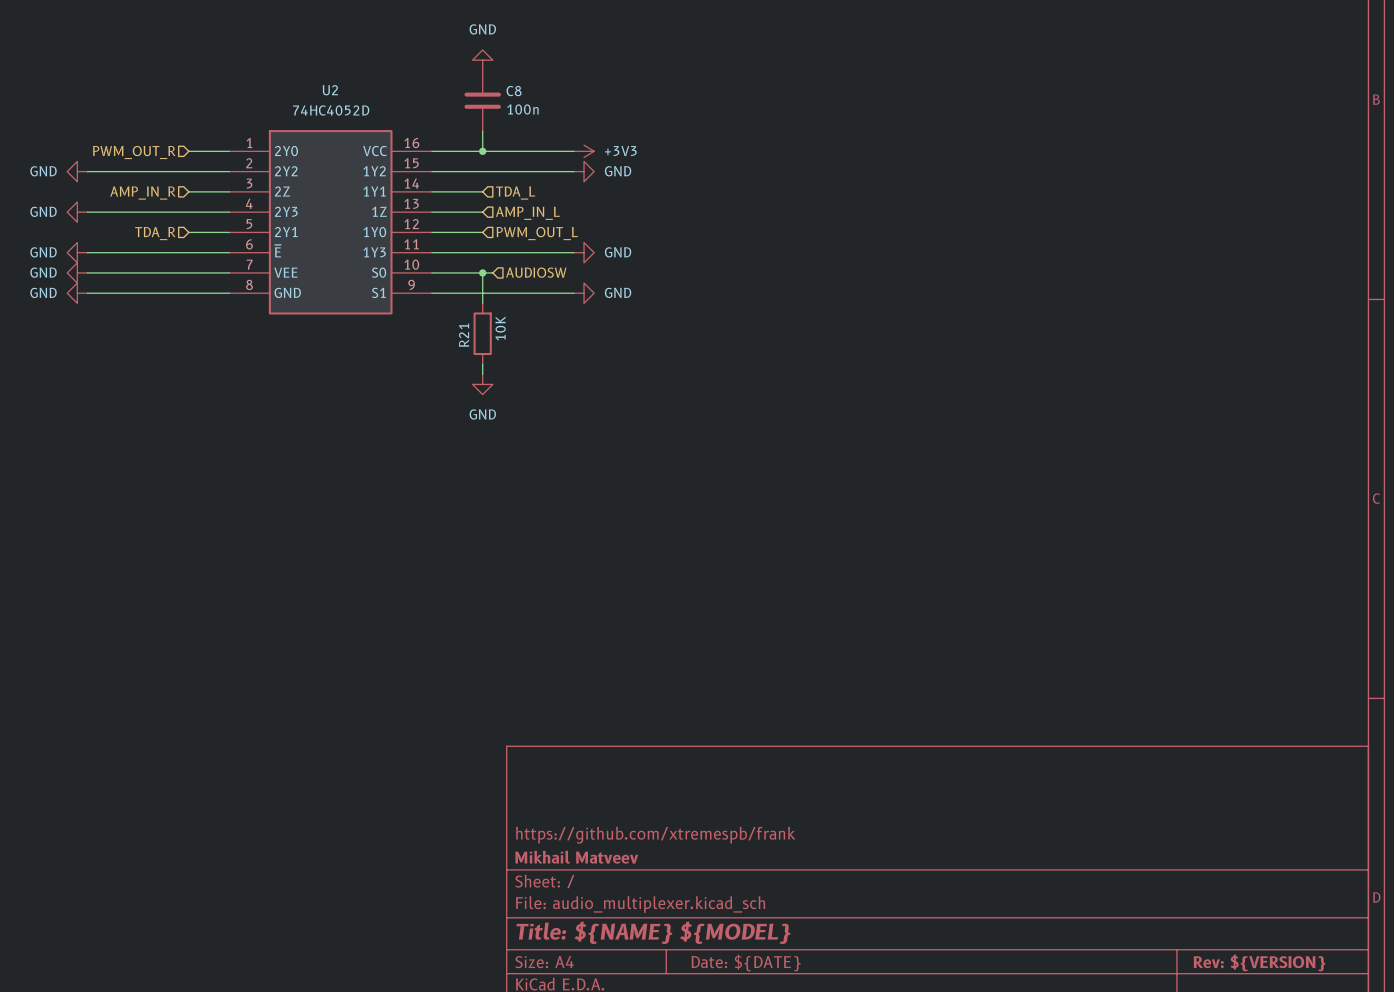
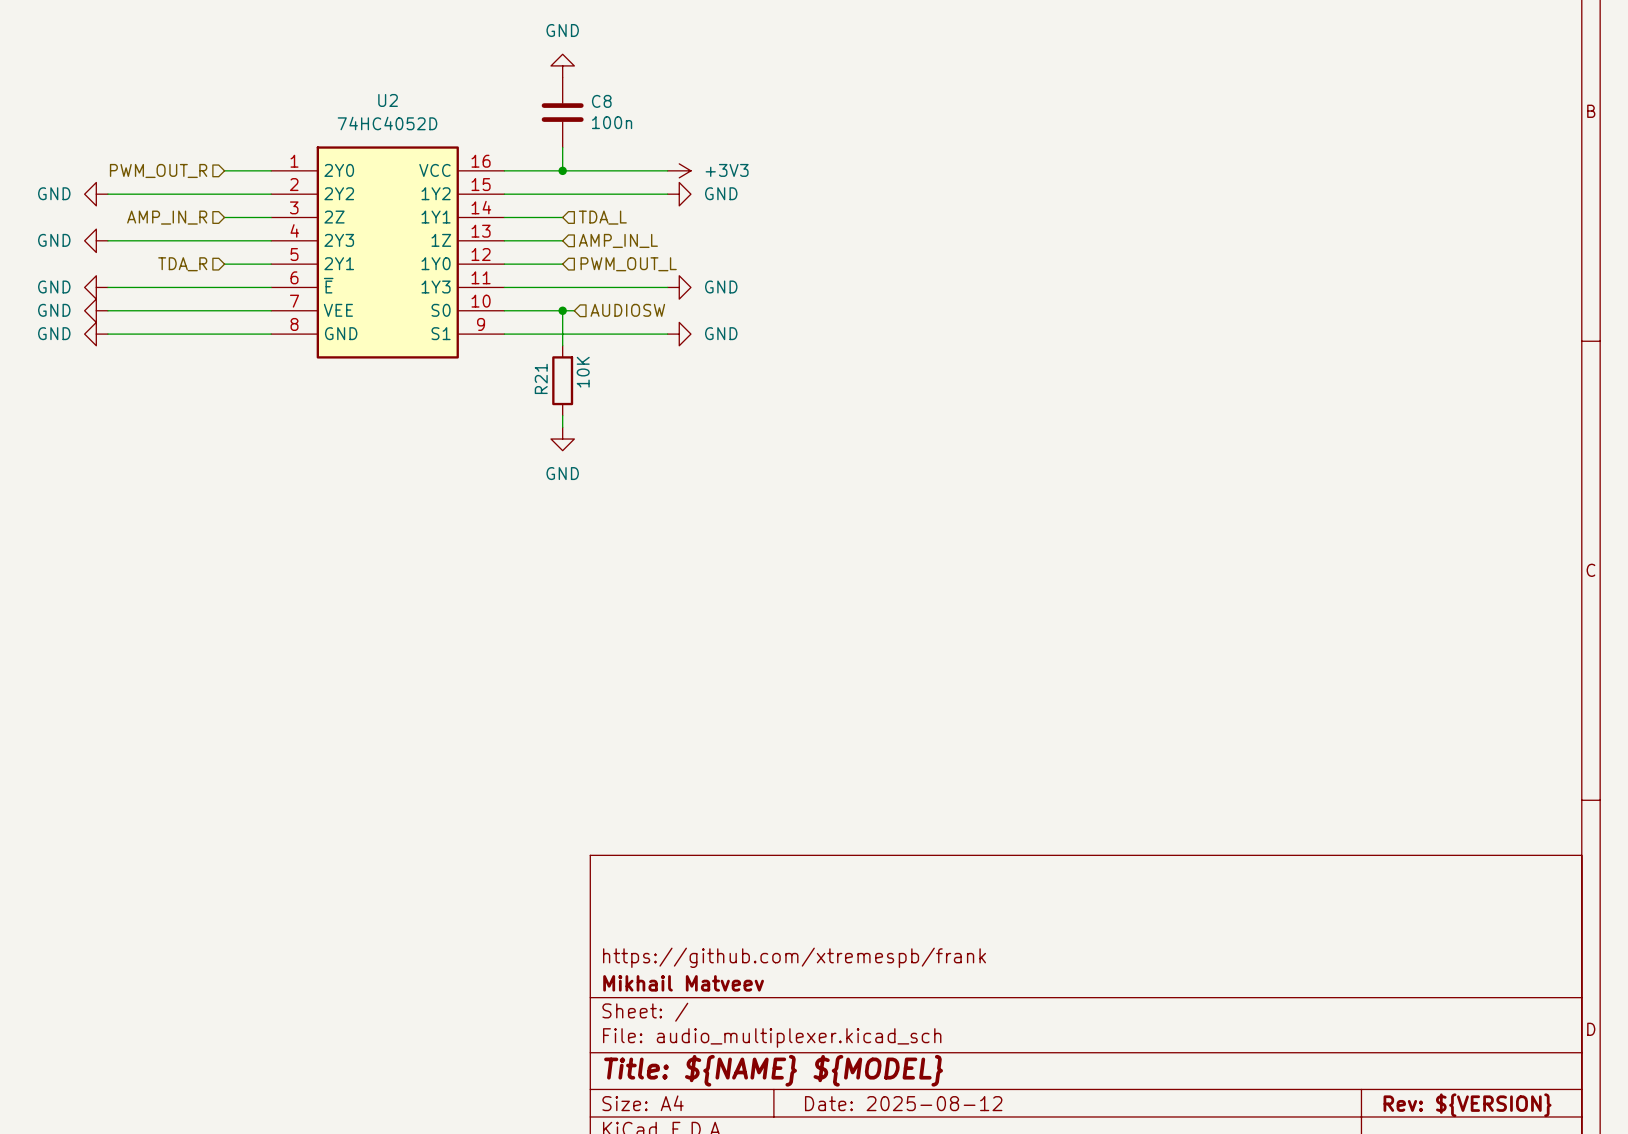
title block: Date: ${DATE} (746, 962) -> Date: 2025-08-12 (903, 1103)

